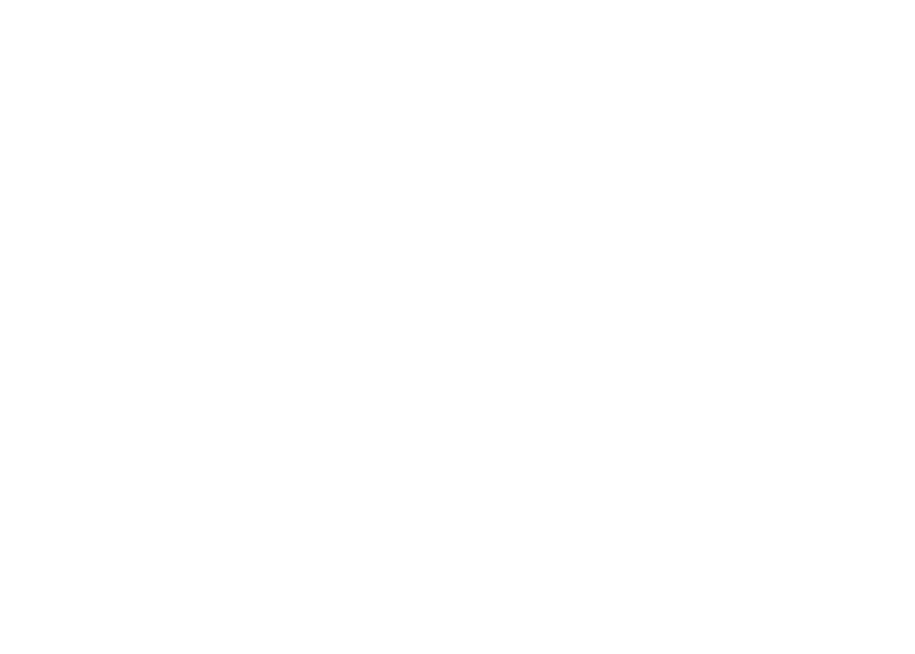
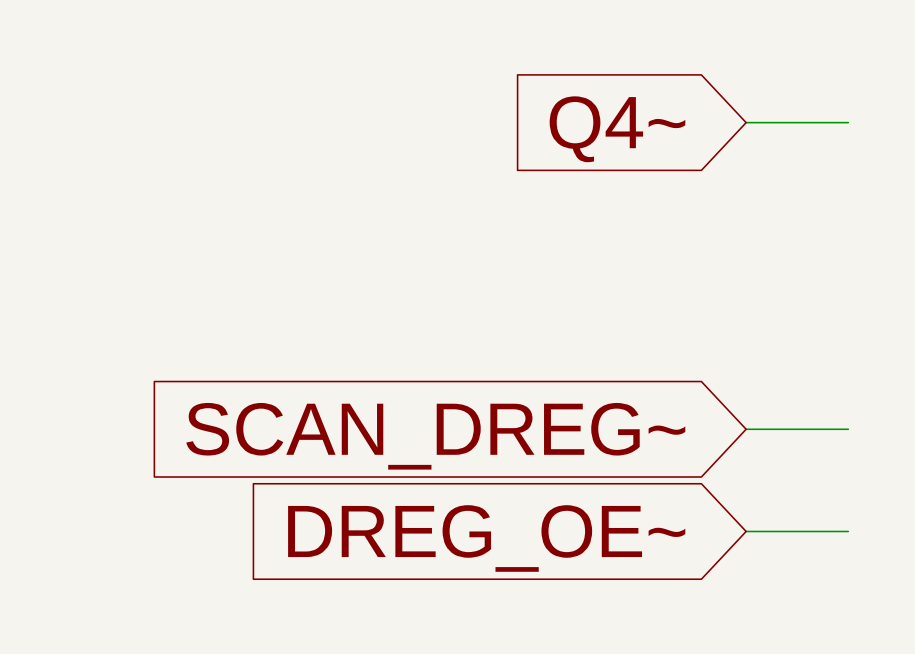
wire: none -> (746, 122) (848, 122)
global label: none -> Q4~ (617, 129)
wire: none -> (746, 429) (848, 429)
global label: none -> SCAN_DREG~ (435, 436)
wire: none -> (746, 531) (848, 531)
global label: none -> DREG_OE~ (486, 538)

